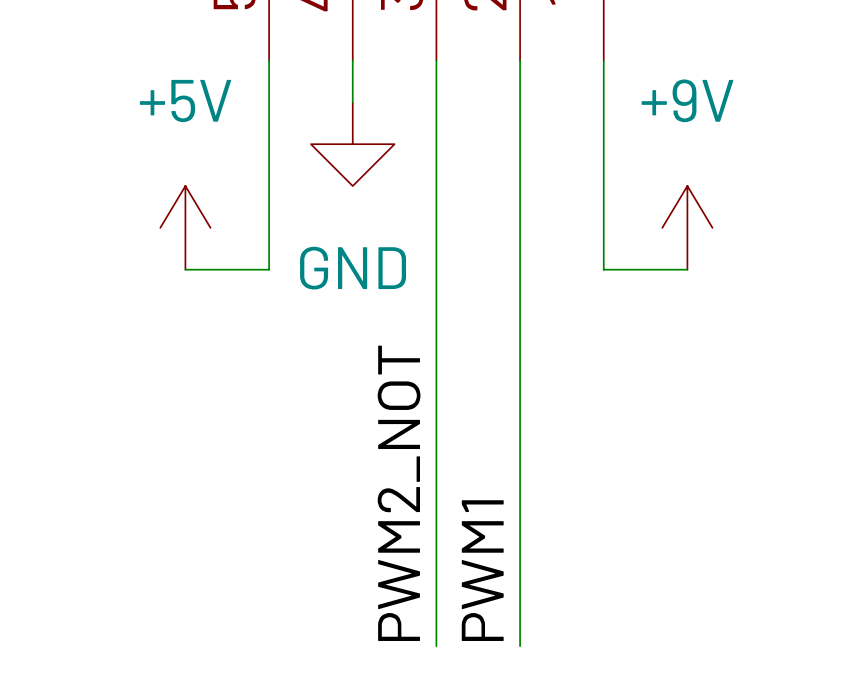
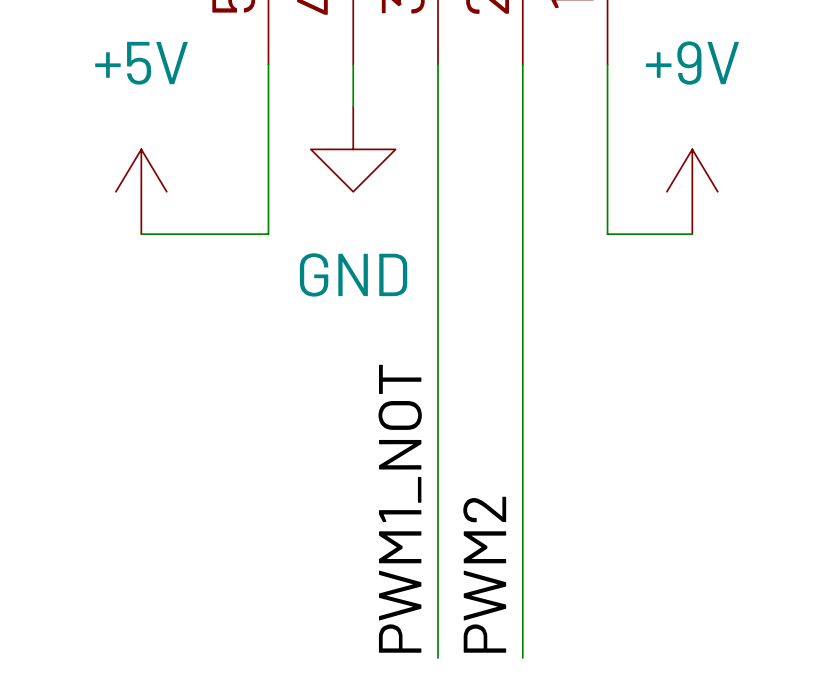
power symbol position: +5V (185, 227) -> +5V (141, 191)
wire: (269, 227) (269, 269) (185, 269) -> (268, 234) (141, 234)
wire: (603, 227) (603, 269) (687, 269) -> (607, 234) (692, 234)
power symbol position: +9V (687, 227) -> +9V (692, 191)
label: PWM2_NOT (399, 493) -> PWM1_NOT (400, 508)
label: PWM1 (482, 570) -> PWM2 (484, 574)

